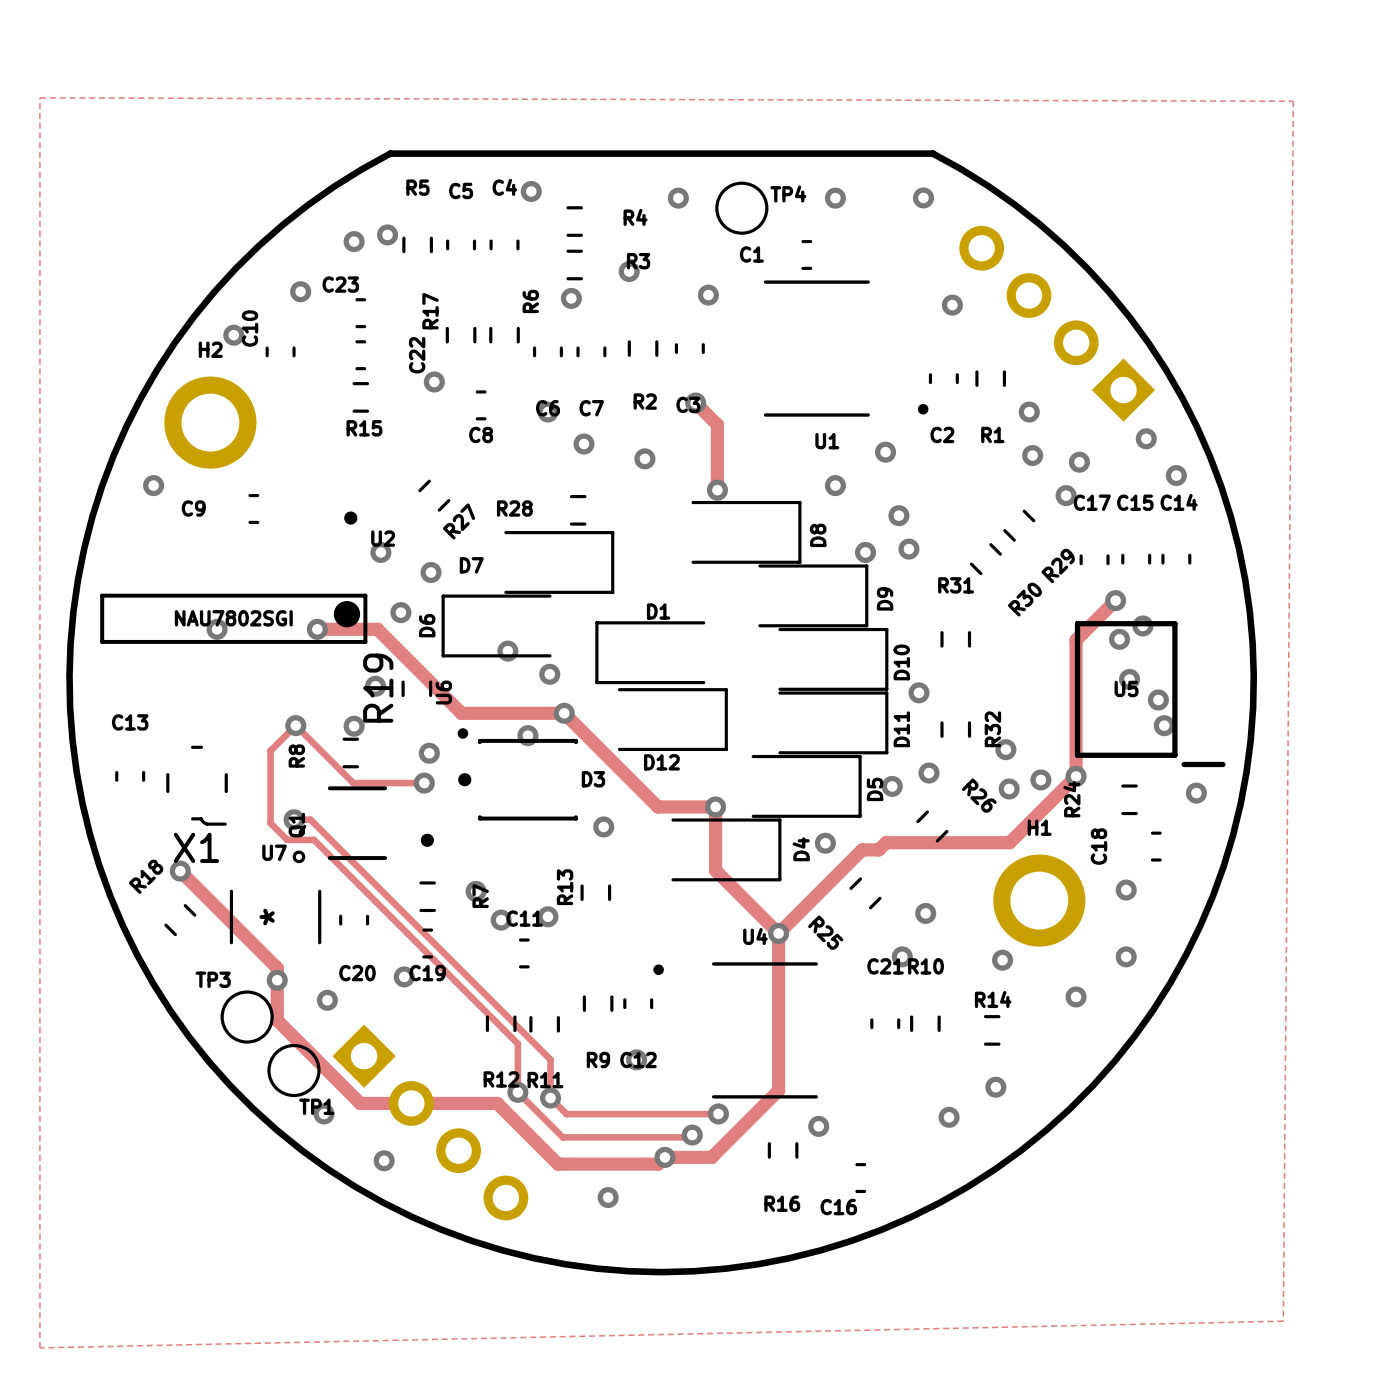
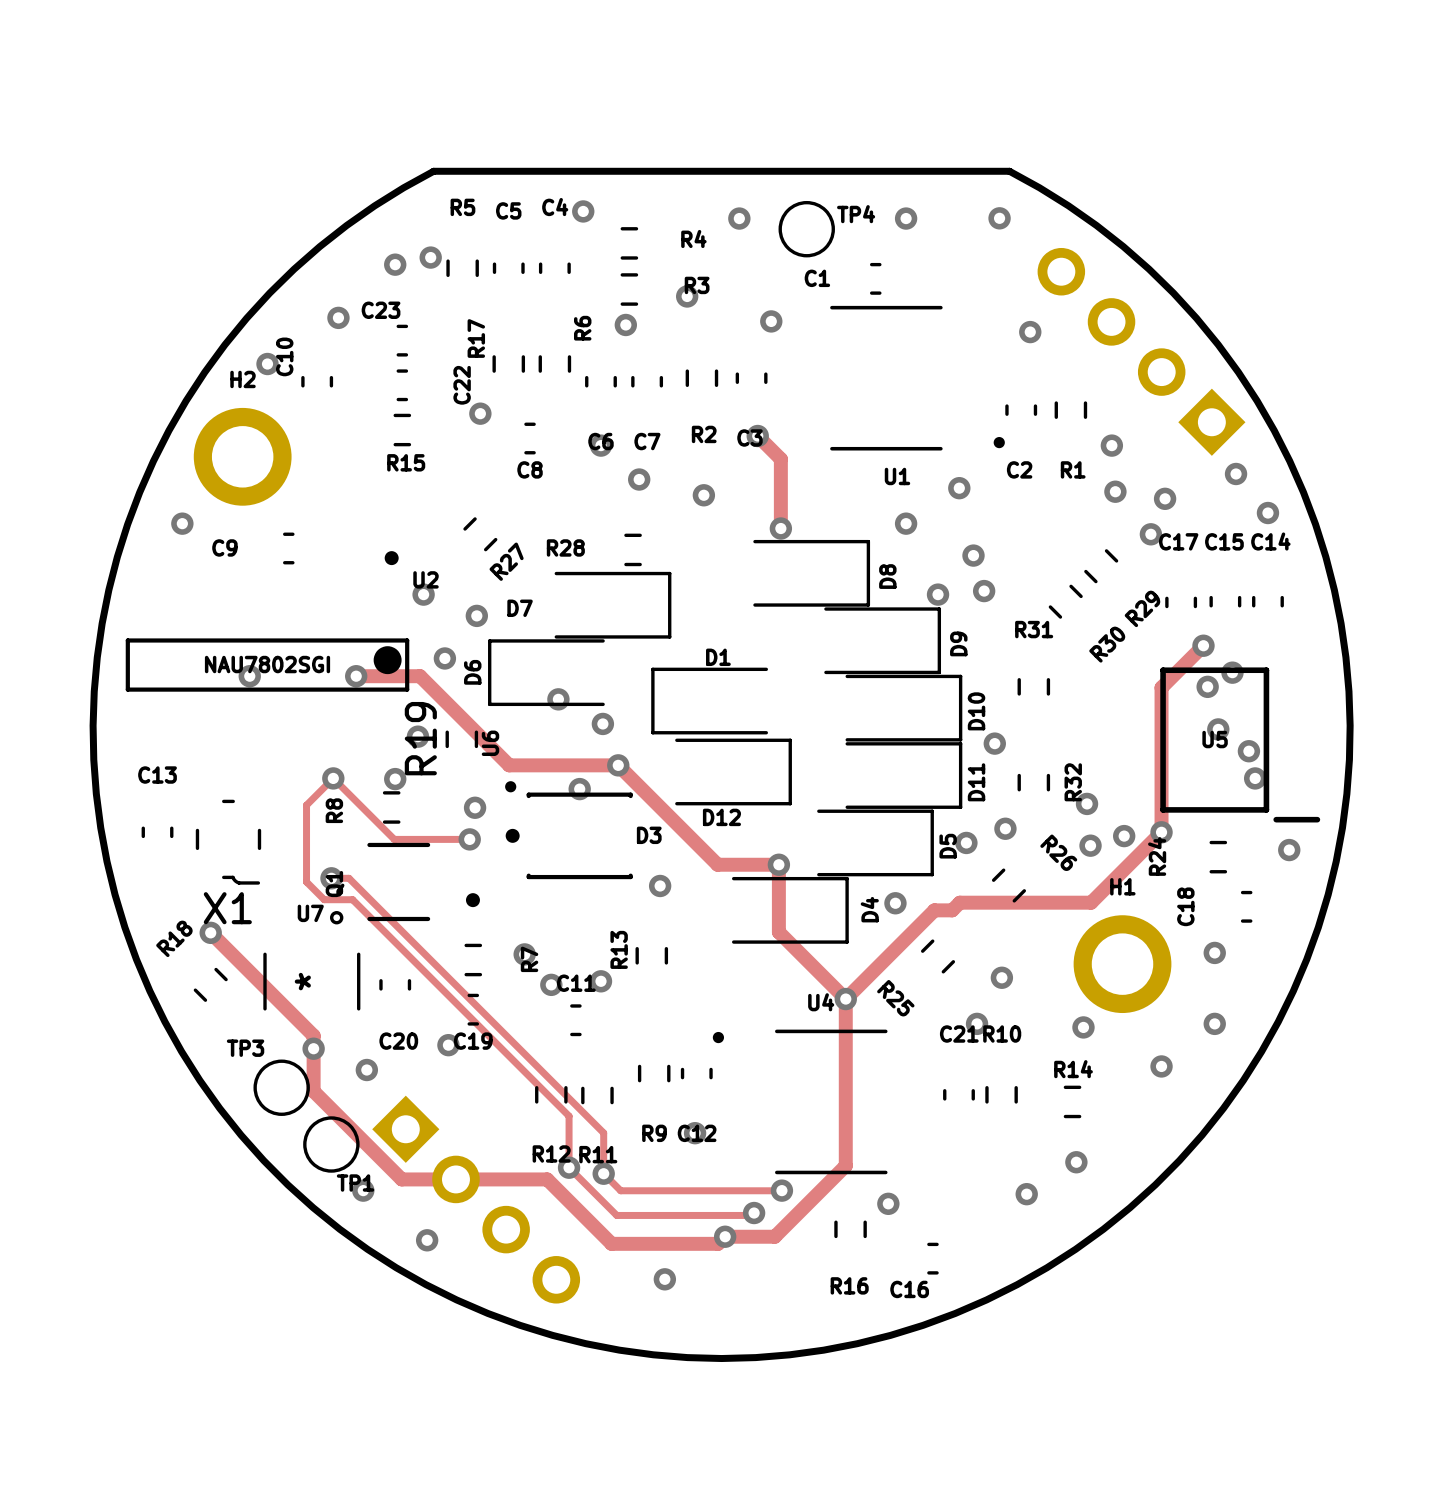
zone outline: (39, 97) (39, 1347) (1283, 1321) (1293, 101) (39, 97) -> none

